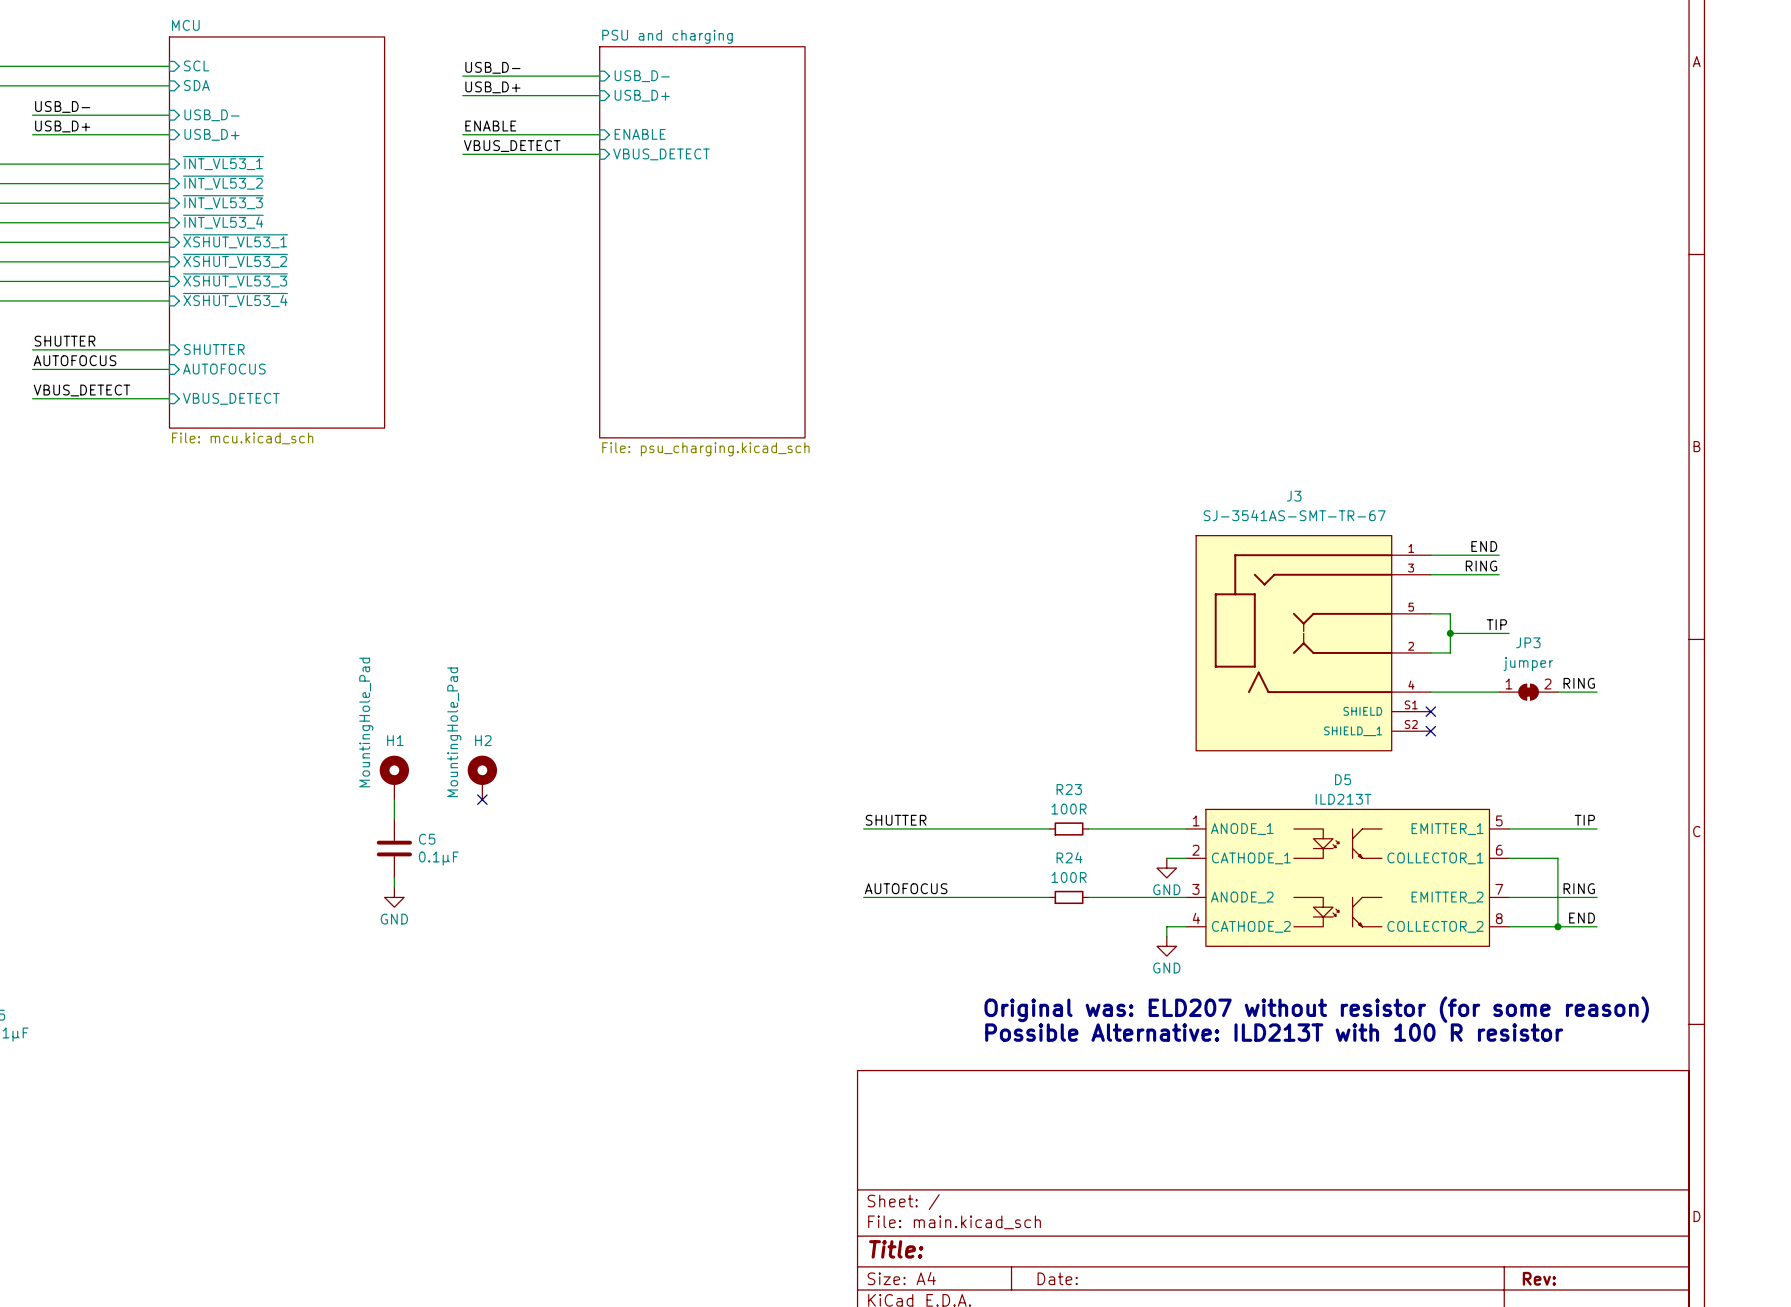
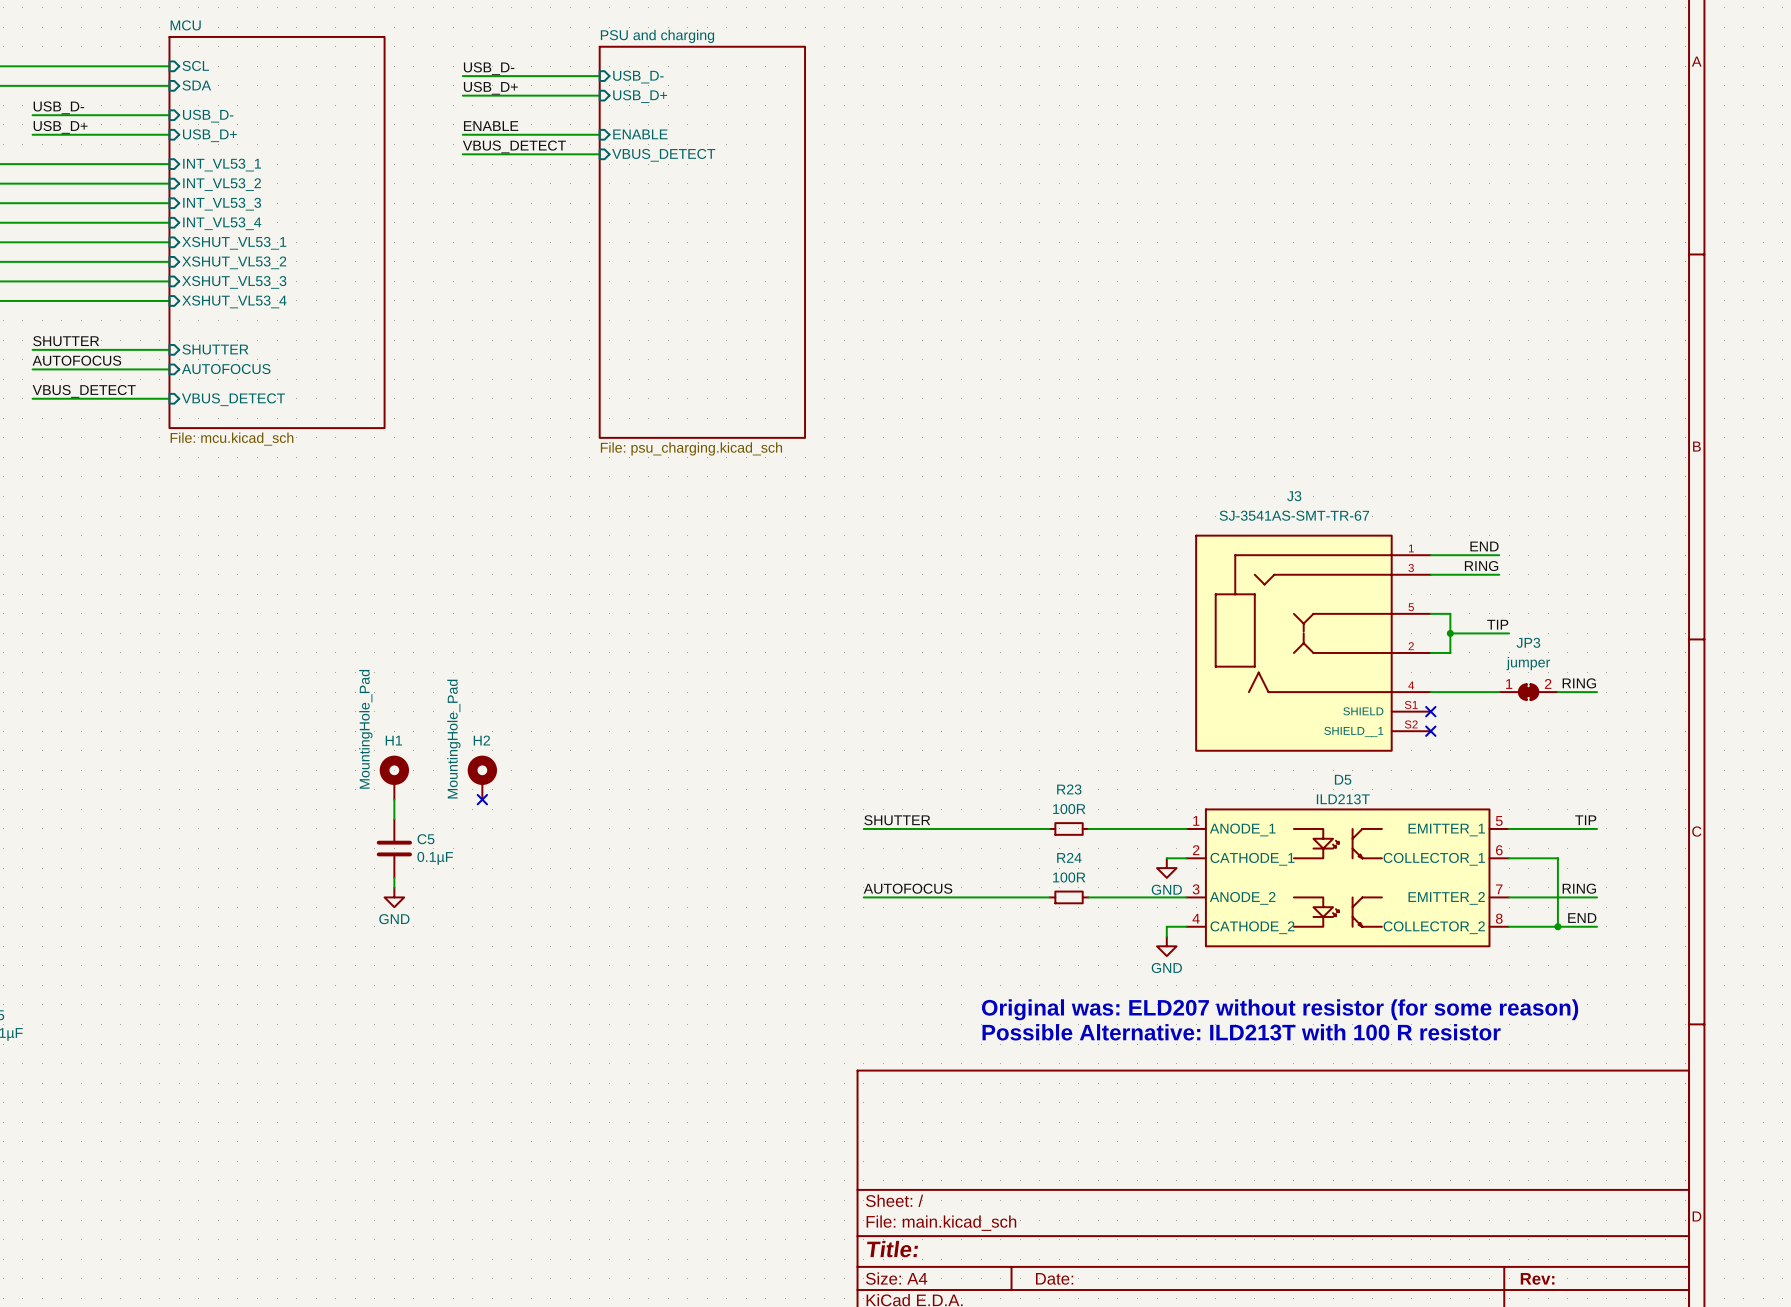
sheet pin: ~{INT_VL53_1} (223, 163) -> INT_VL53_1 (222, 165)
sheet pin: ~{INT_VL53_2} (223, 182) -> INT_VL53_2 (222, 184)
sheet pin: ~{INT_VL53_3} (223, 202) -> INT_VL53_3 (222, 204)
sheet pin: ~{INT_VL53_4} (223, 221) -> INT_VL53_4 (222, 223)
sheet pin: ~{XSHUT_VL53_1} (235, 241) -> XSHUT_VL53_1 (234, 243)
sheet pin: ~{XSHUT_VL53_2} (235, 260) -> XSHUT_VL53_2 (234, 262)
sheet pin: ~{XSHUT_VL53_3} (235, 280) -> XSHUT_VL53_3 (234, 282)
sheet pin: ~{XSHUT_VL53_4} (235, 299) -> XSHUT_VL53_4 (234, 301)

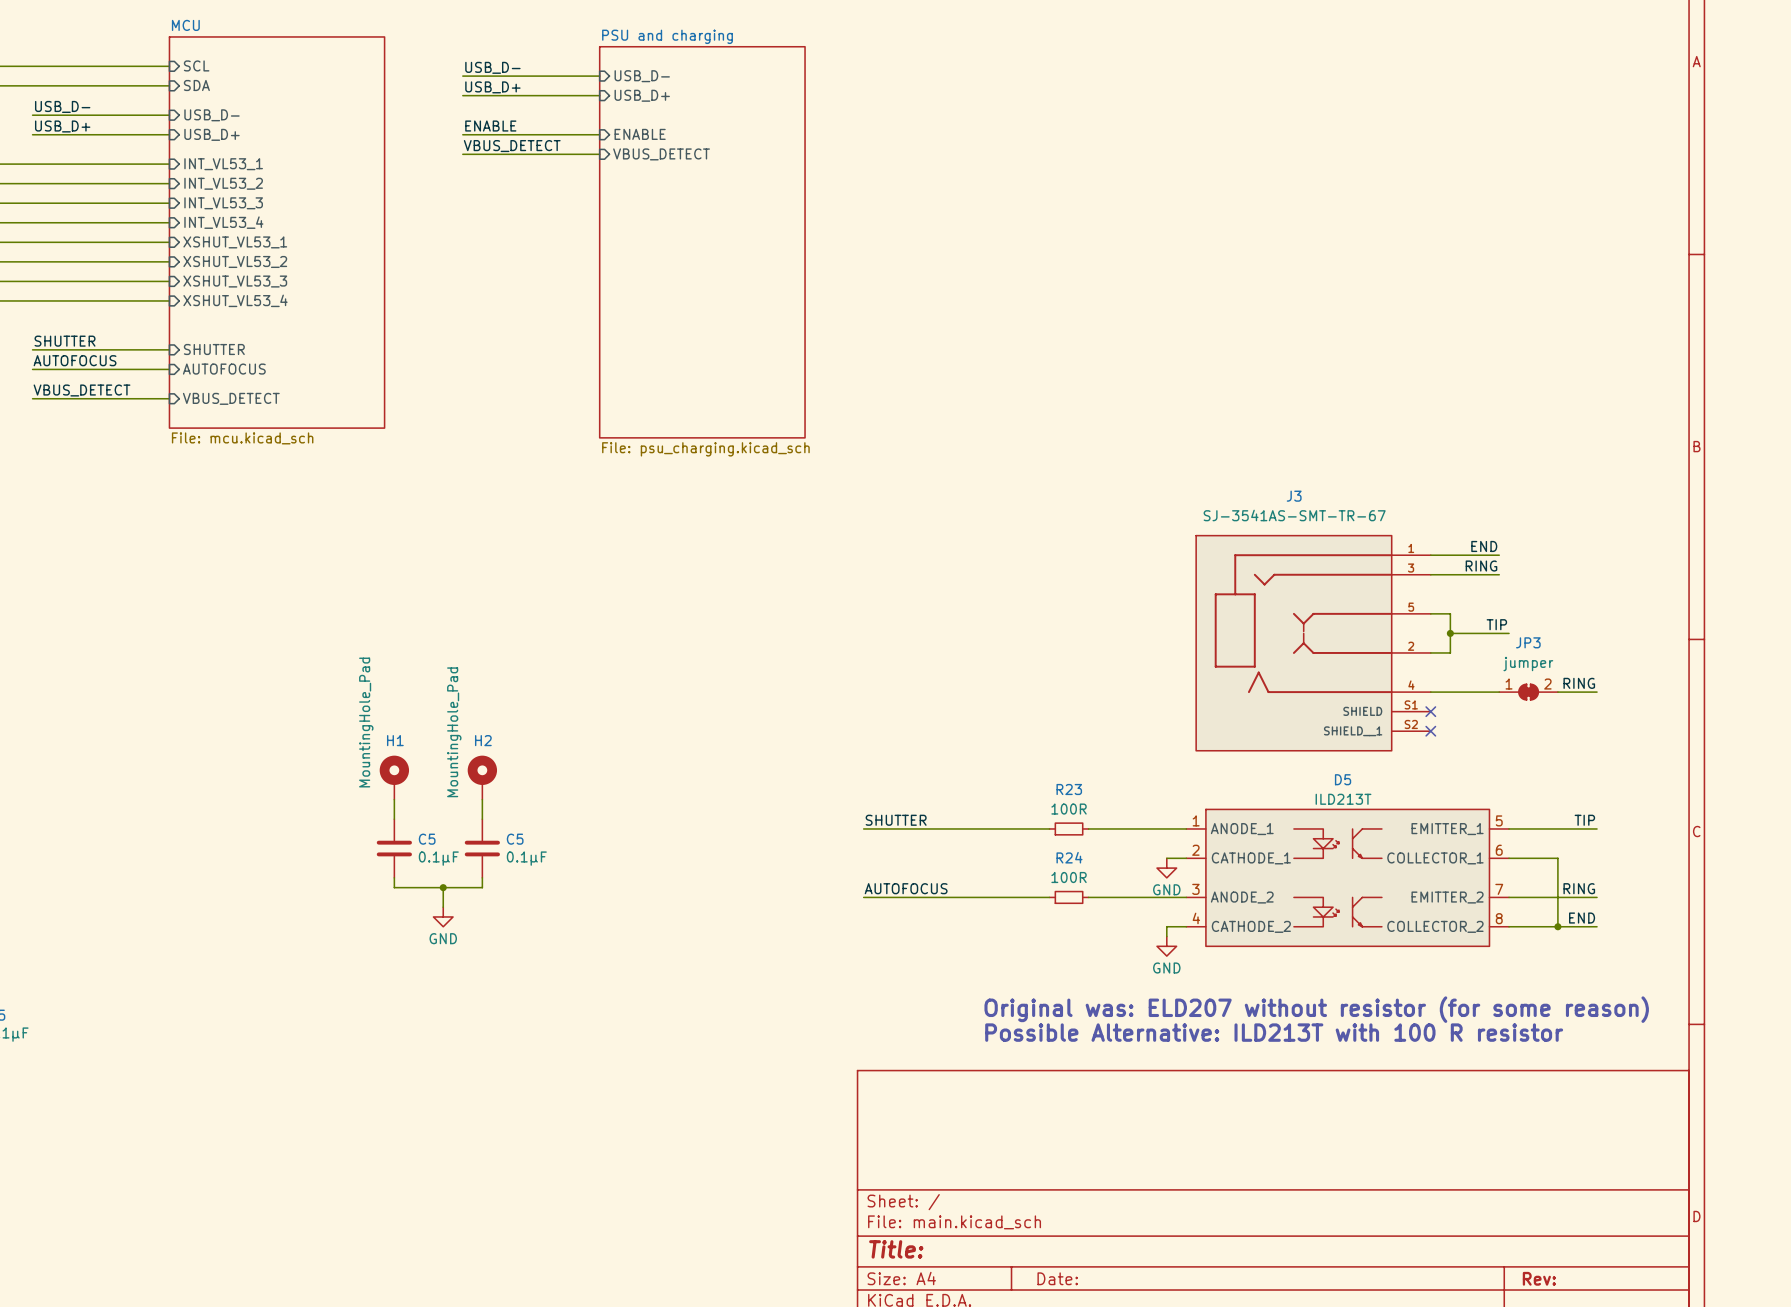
wire: none -> (482, 799) (482, 819)
no-connect mark: (482, 799) -> none
C5: none -> 0.1µF (482, 848)
wire: none -> (482, 877) (482, 887) (394, 887)
wire: none -> (443, 887) (443, 907)
junction: none -> (443, 887)
power symbol position: GND (394, 897) -> GND (443, 916)

